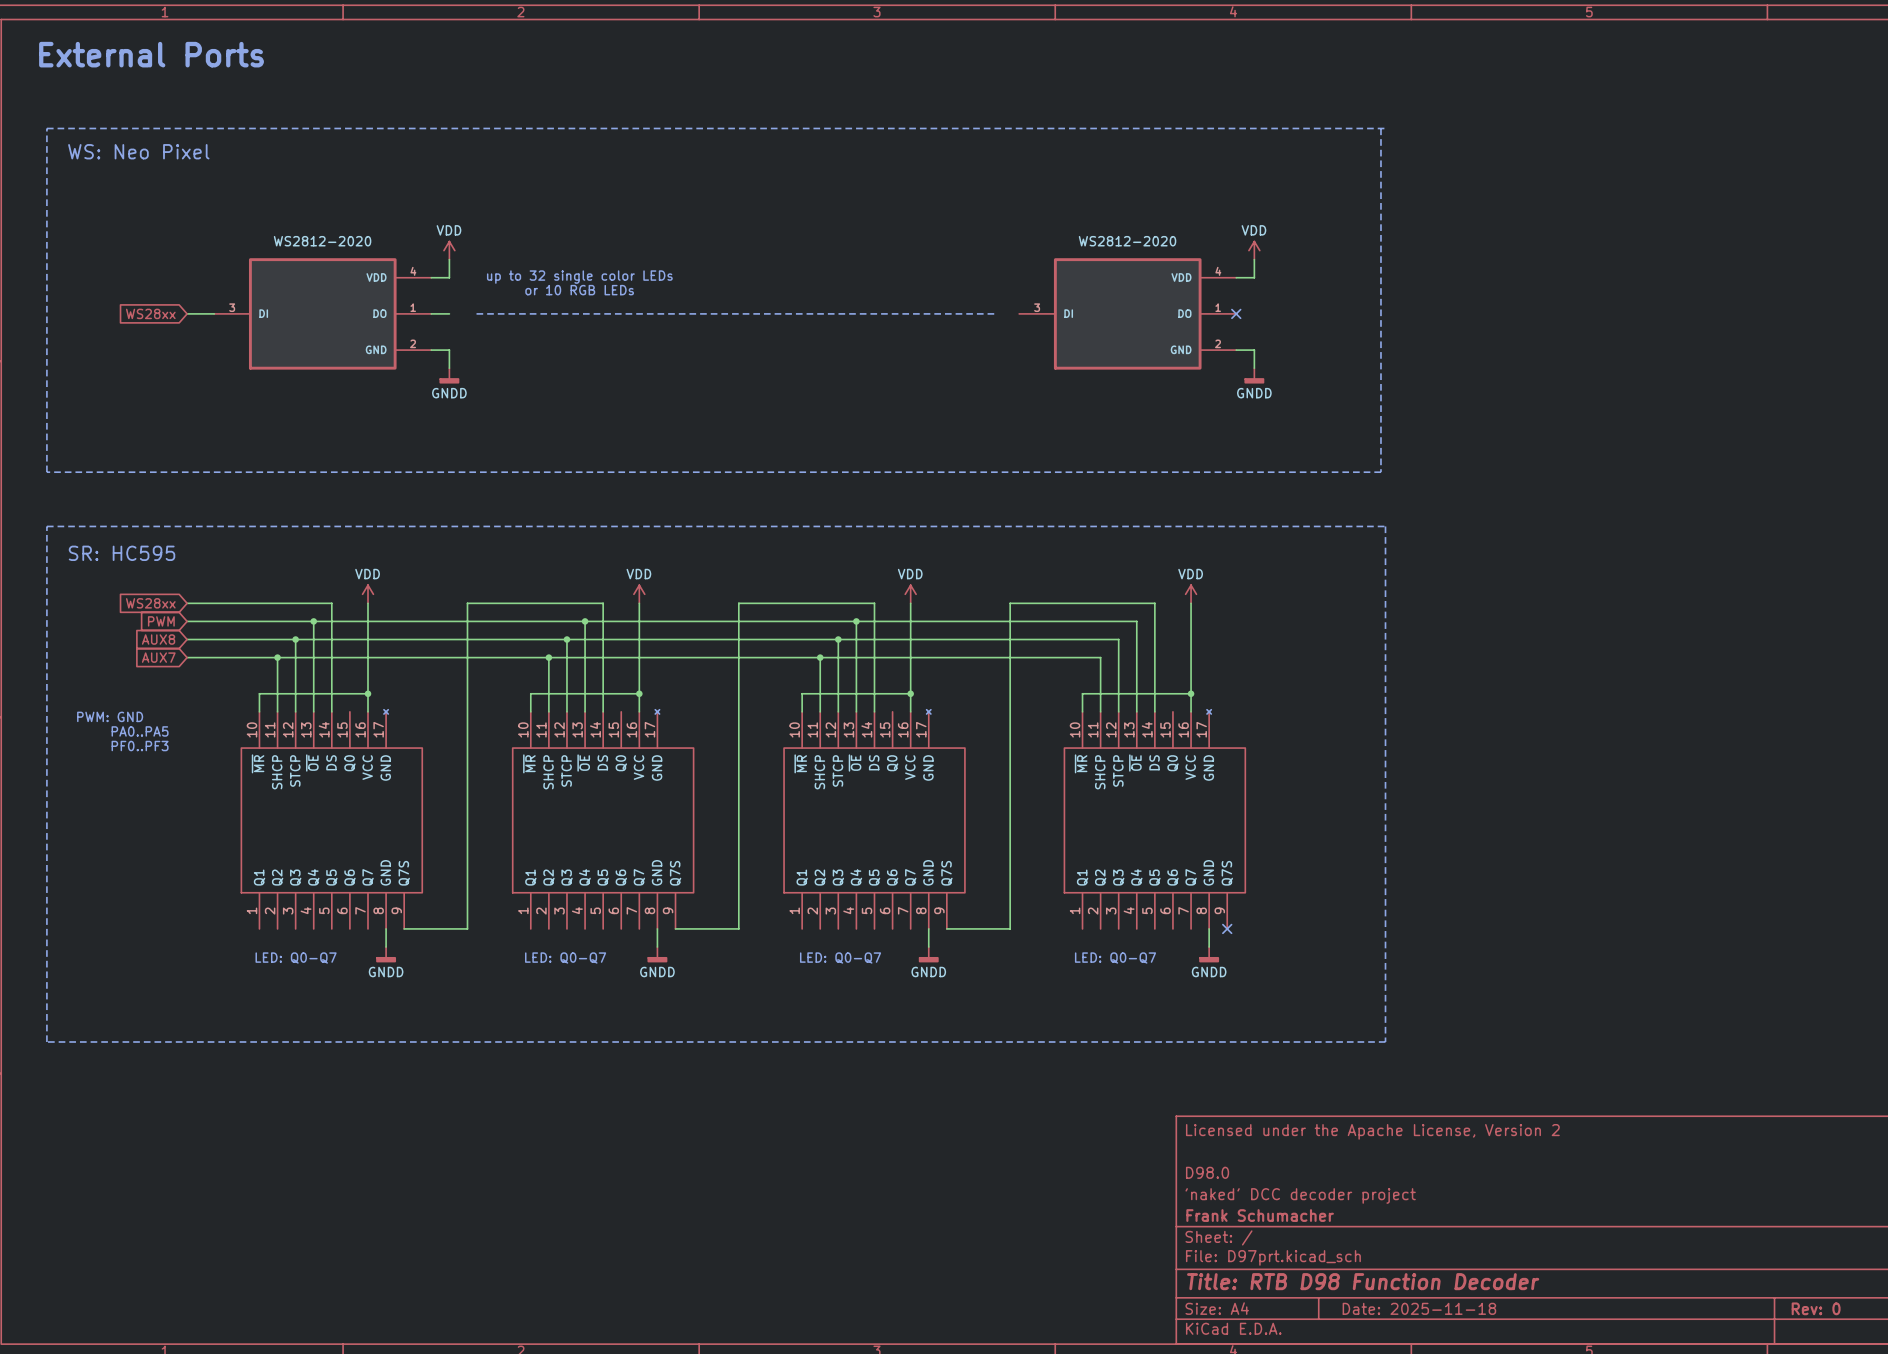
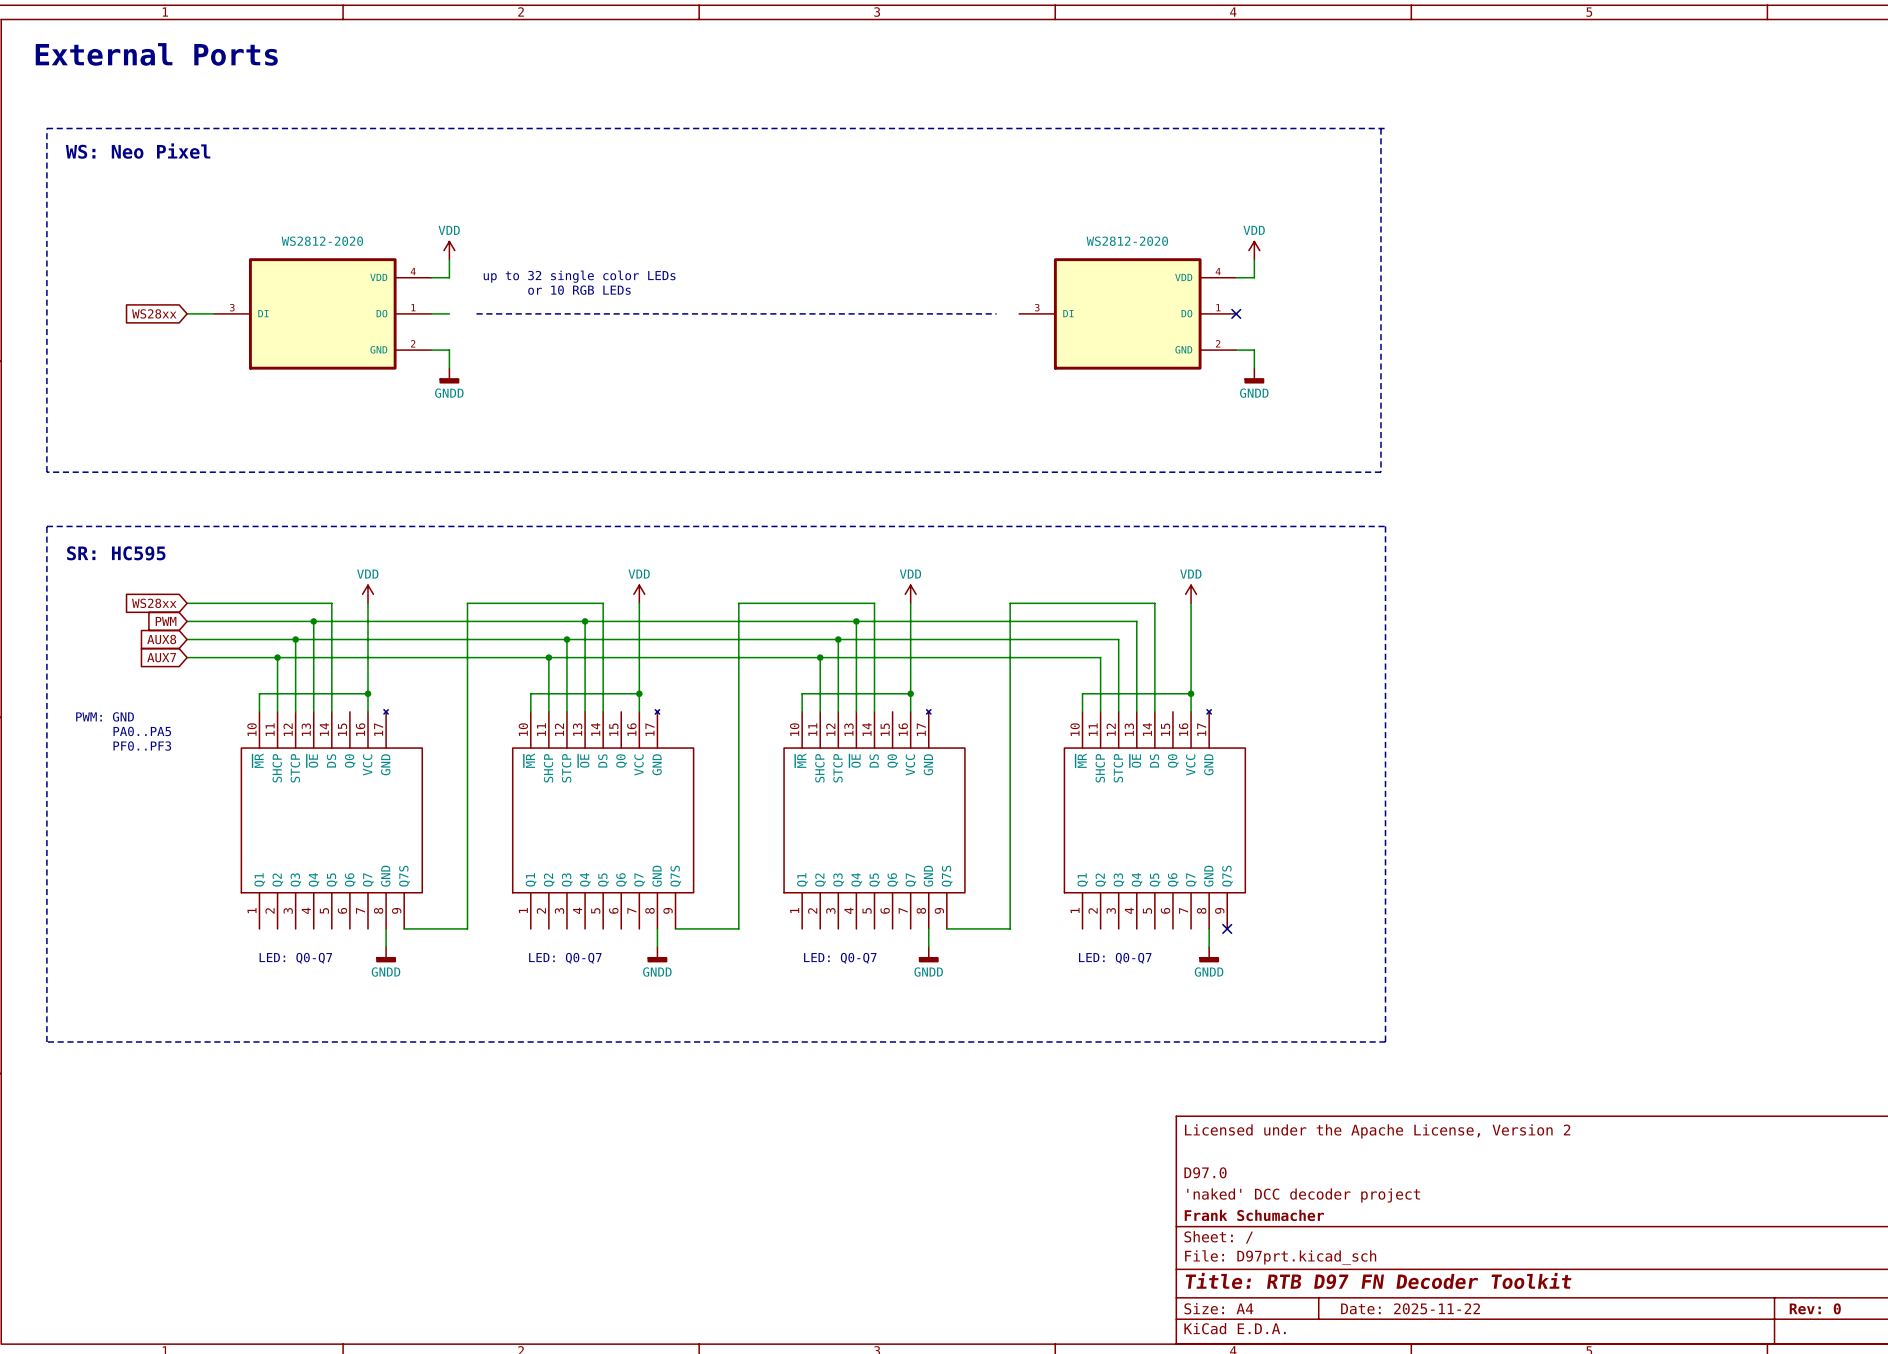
title block: D98.0 (1207, 1172) -> D97.0 (1205, 1172)
title block: Title: RTB D98 Function Decoder (1363, 1281) -> Title: RTB D97 FN Decoder Toolkit (1378, 1281)
title block: Date: 2025-11-18 (1419, 1308) -> Date: 2025-11-22 (1410, 1308)

